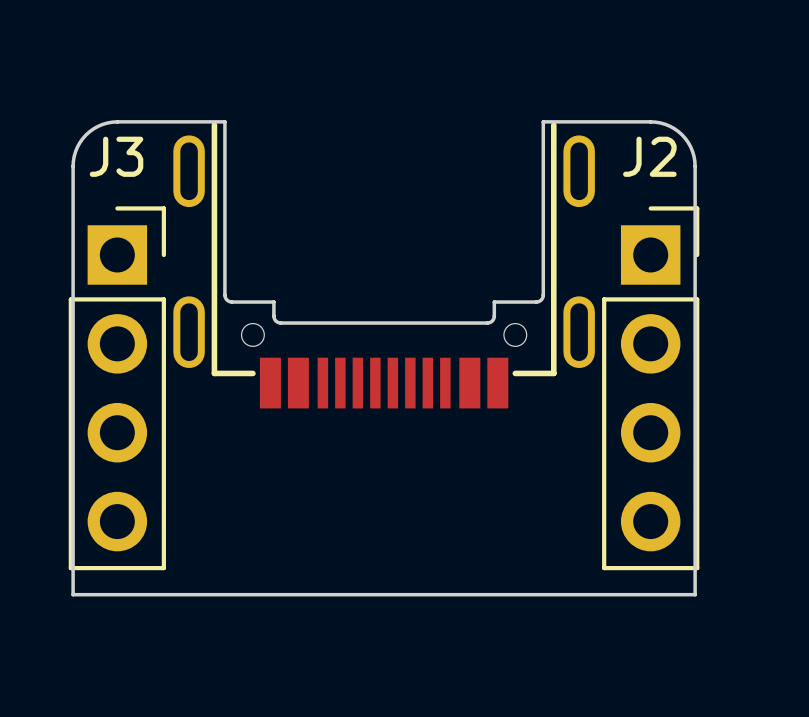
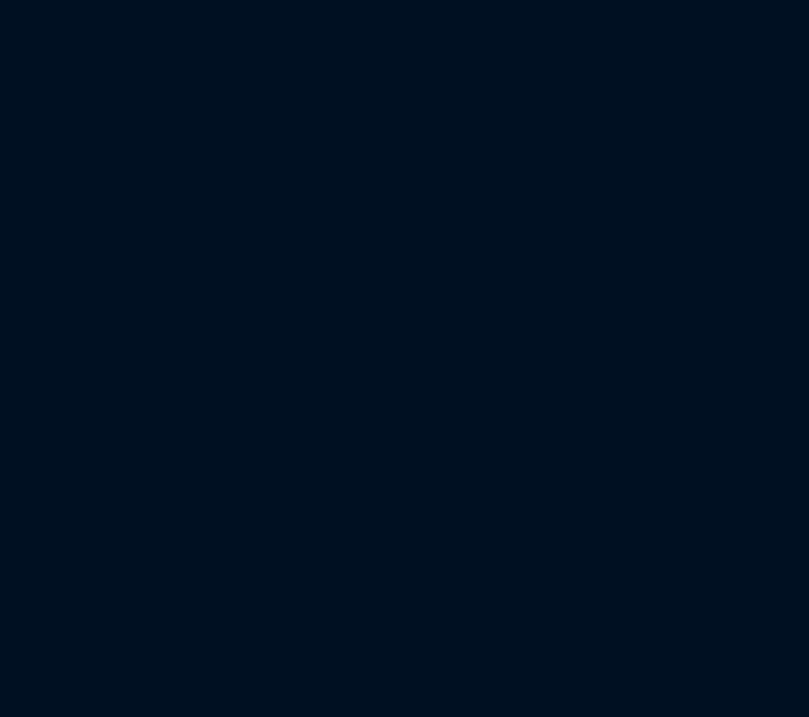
board edge: (117, 121) (224, 121) (225, 296) (231, 301) (273, 302) (274, 317) (280, 323) (488, 322) (494, 317) (494, 302) (538, 301) (543, 295) (543, 121) (655, 122) (669, 126) (678, 131) (690, 147) (695, 166) (695, 594) (73, 594) (73, 161) (77, 147) (89, 131) (102, 124) (117, 121) -> none
part: (384, 265) -> none
J3: (117, 388) -> none
J2: (650, 388) -> none

